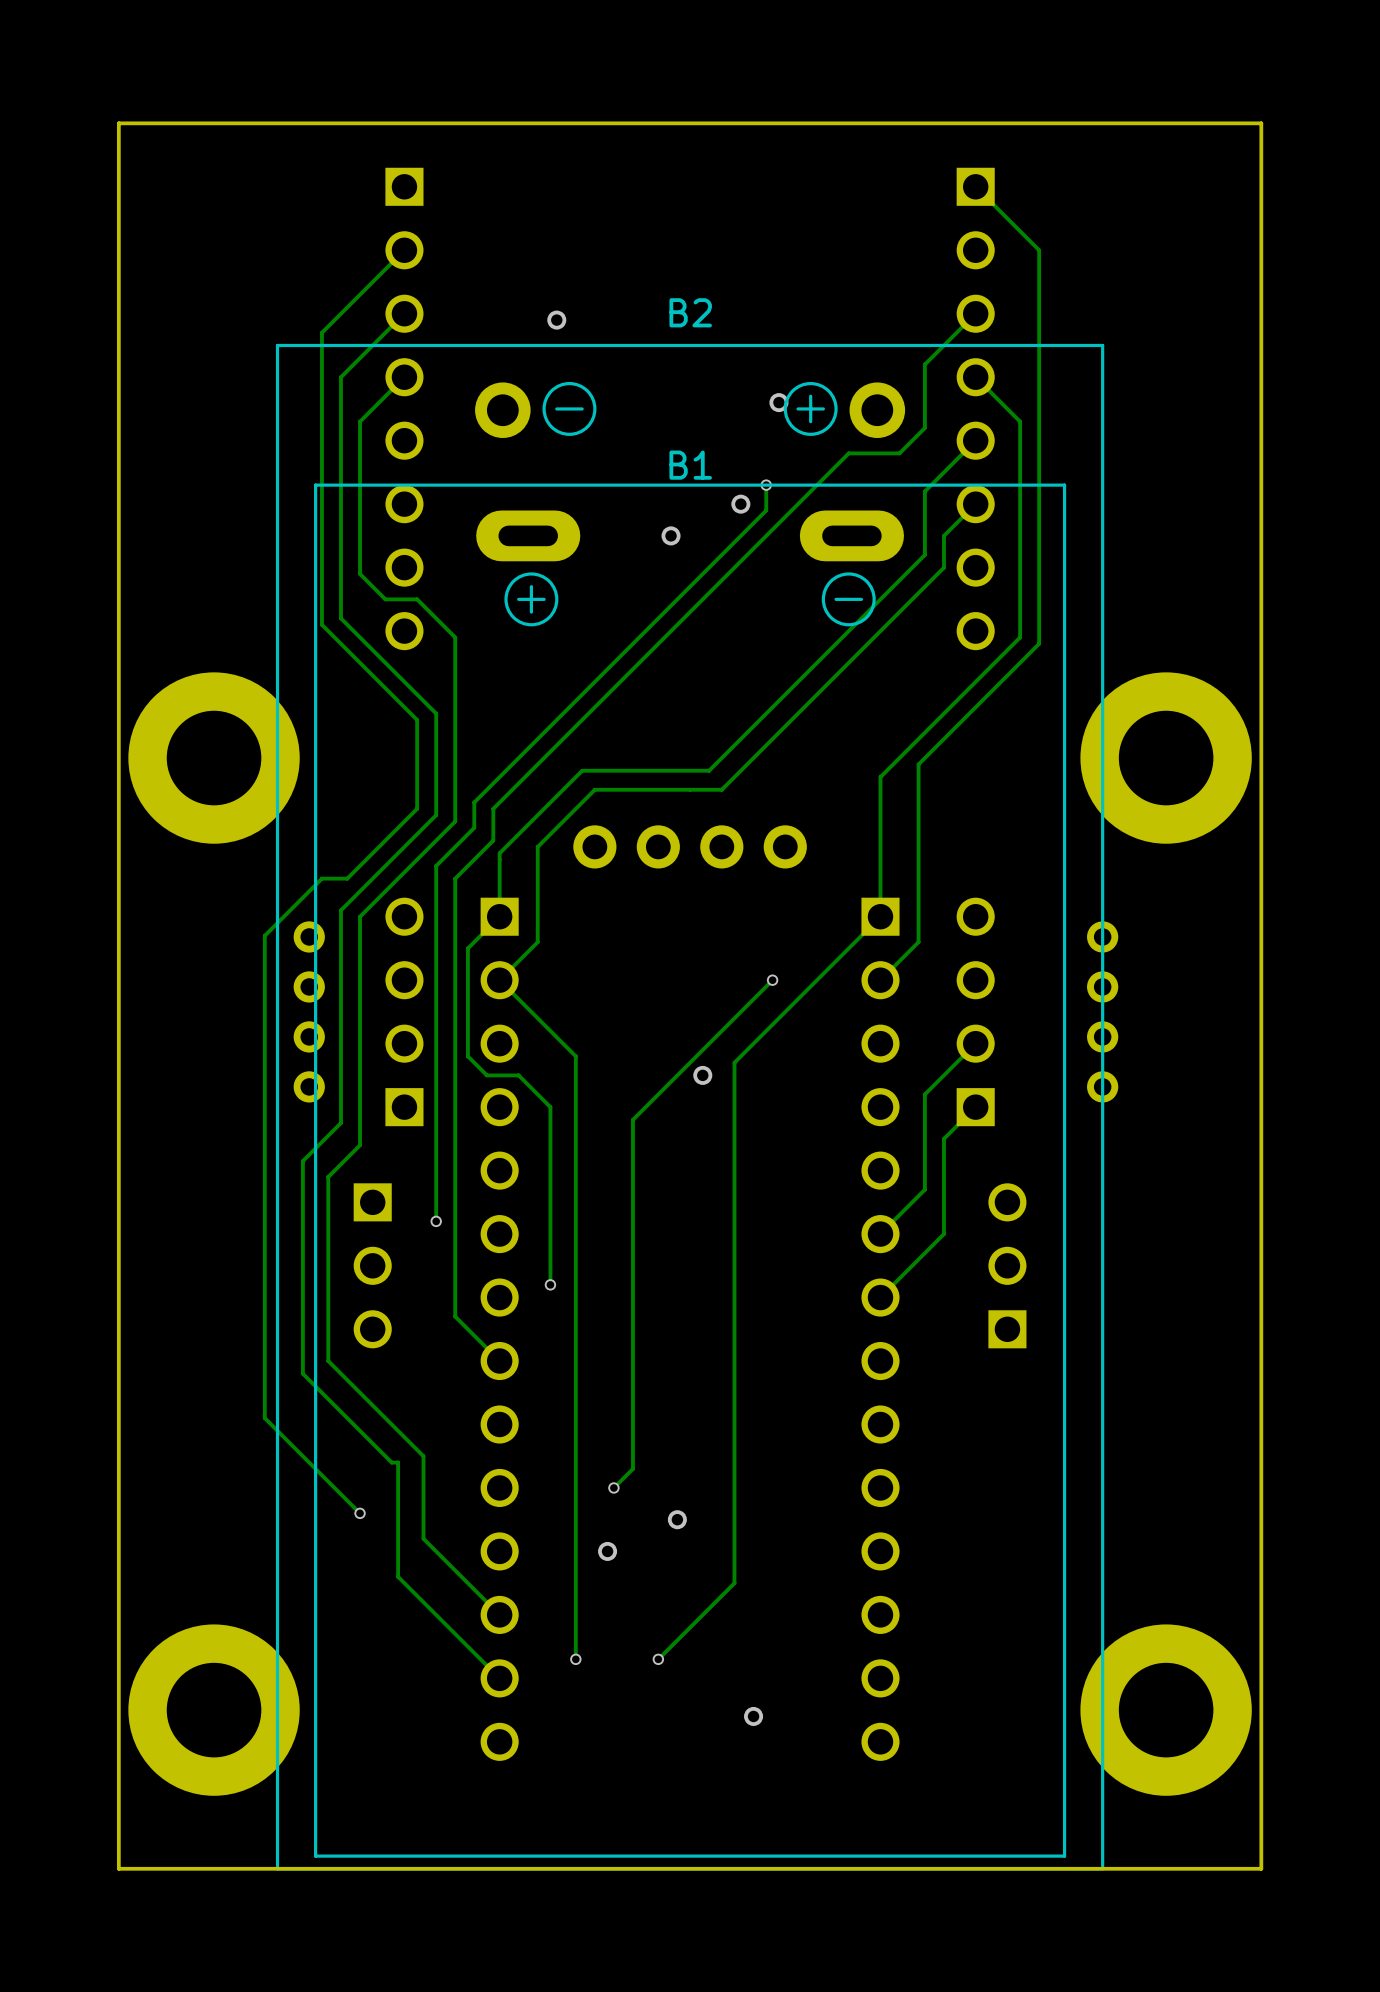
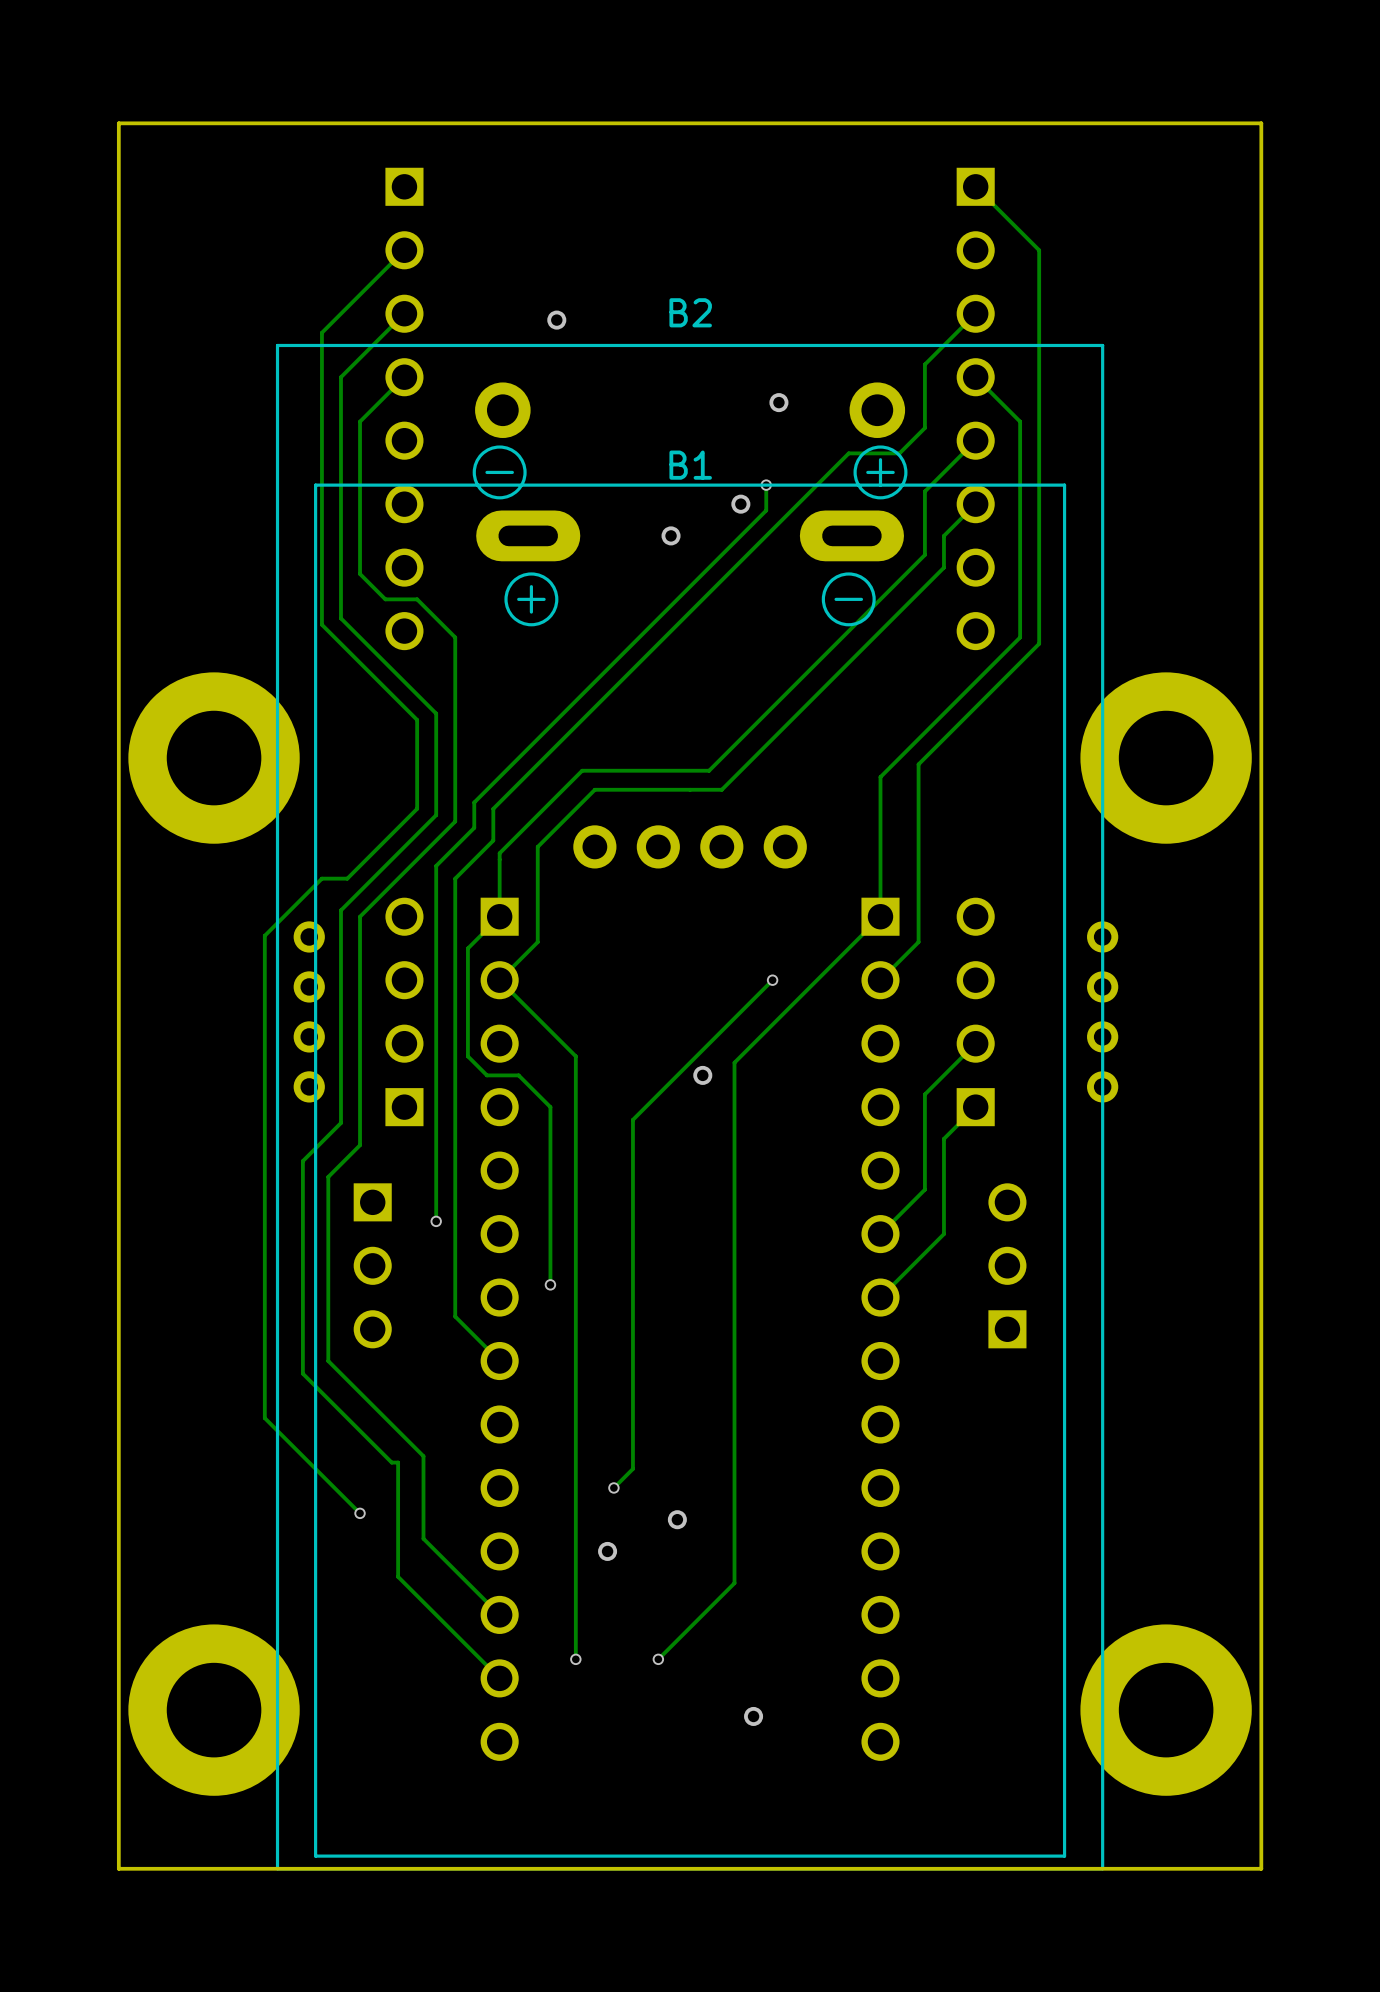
B2 footprint: [275, 343, 1105, 1871] -> [275, 343, 1105, 1871]

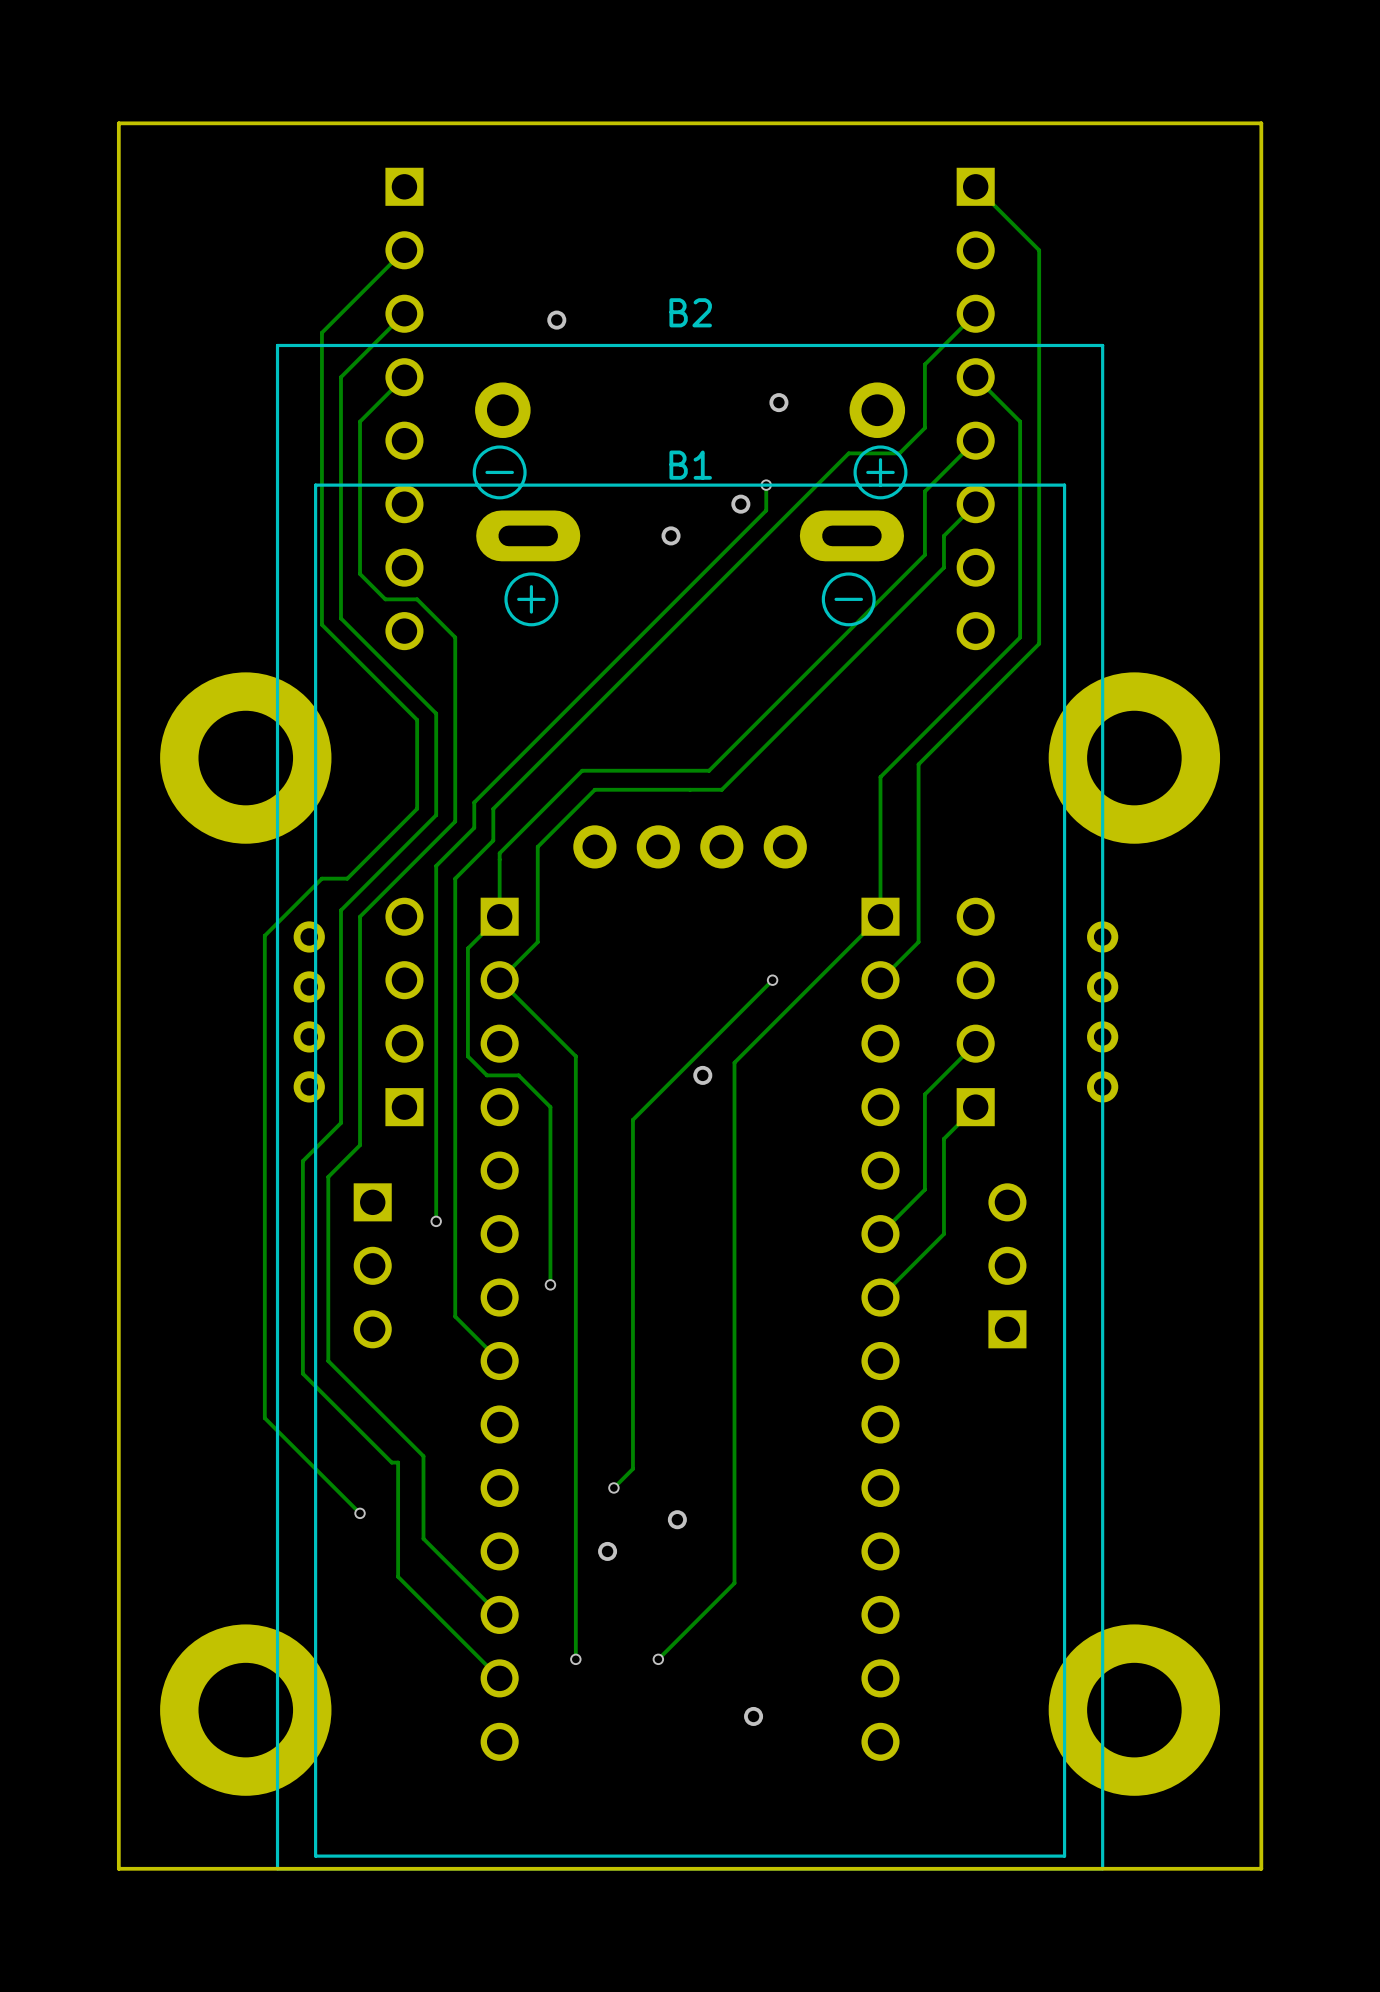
part position: (214, 758) -> (245, 758)
part position: (1166, 758) -> (1134, 758)
part position: (214, 1710) -> (245, 1710)
part position: (1166, 1710) -> (1134, 1710)

